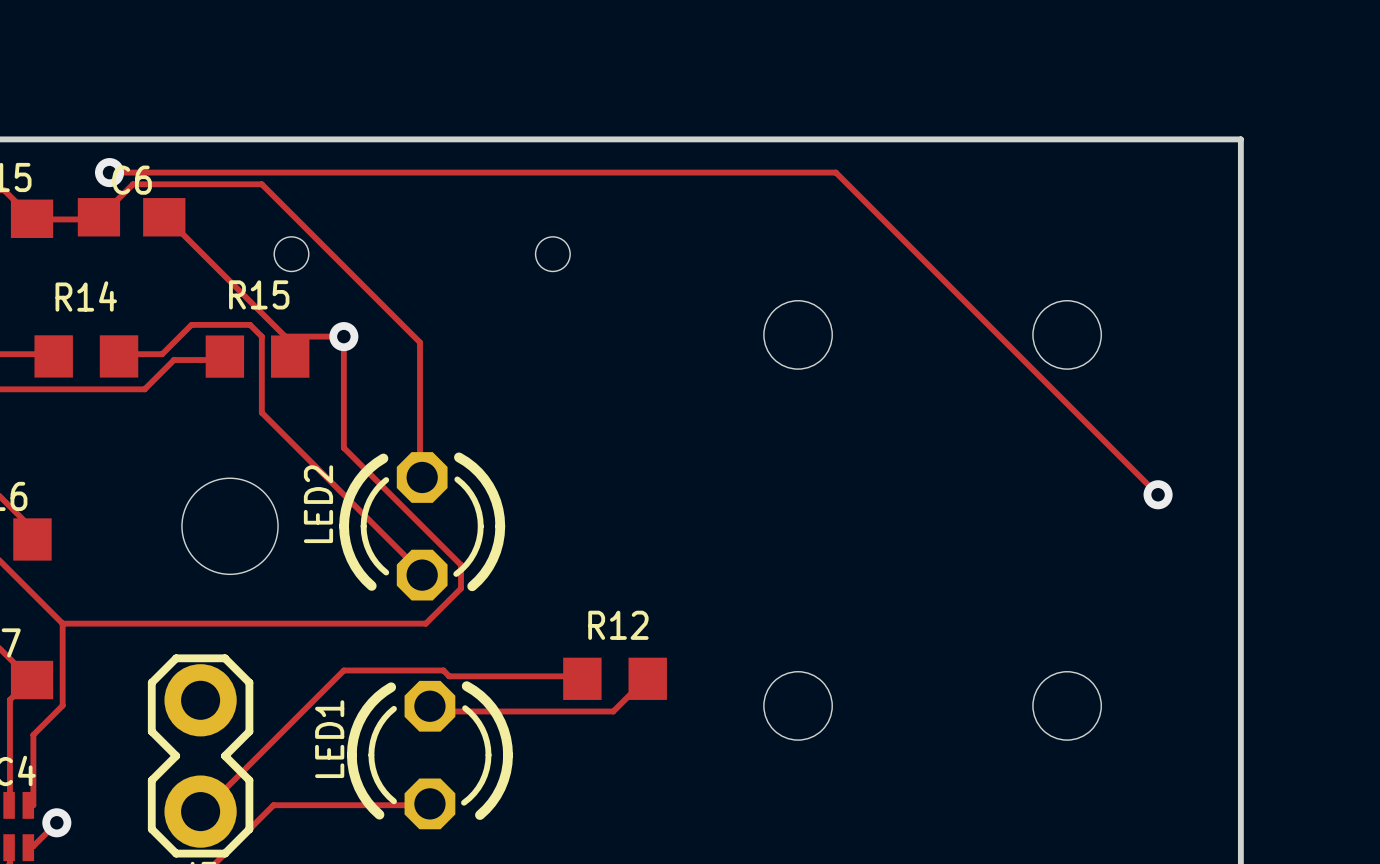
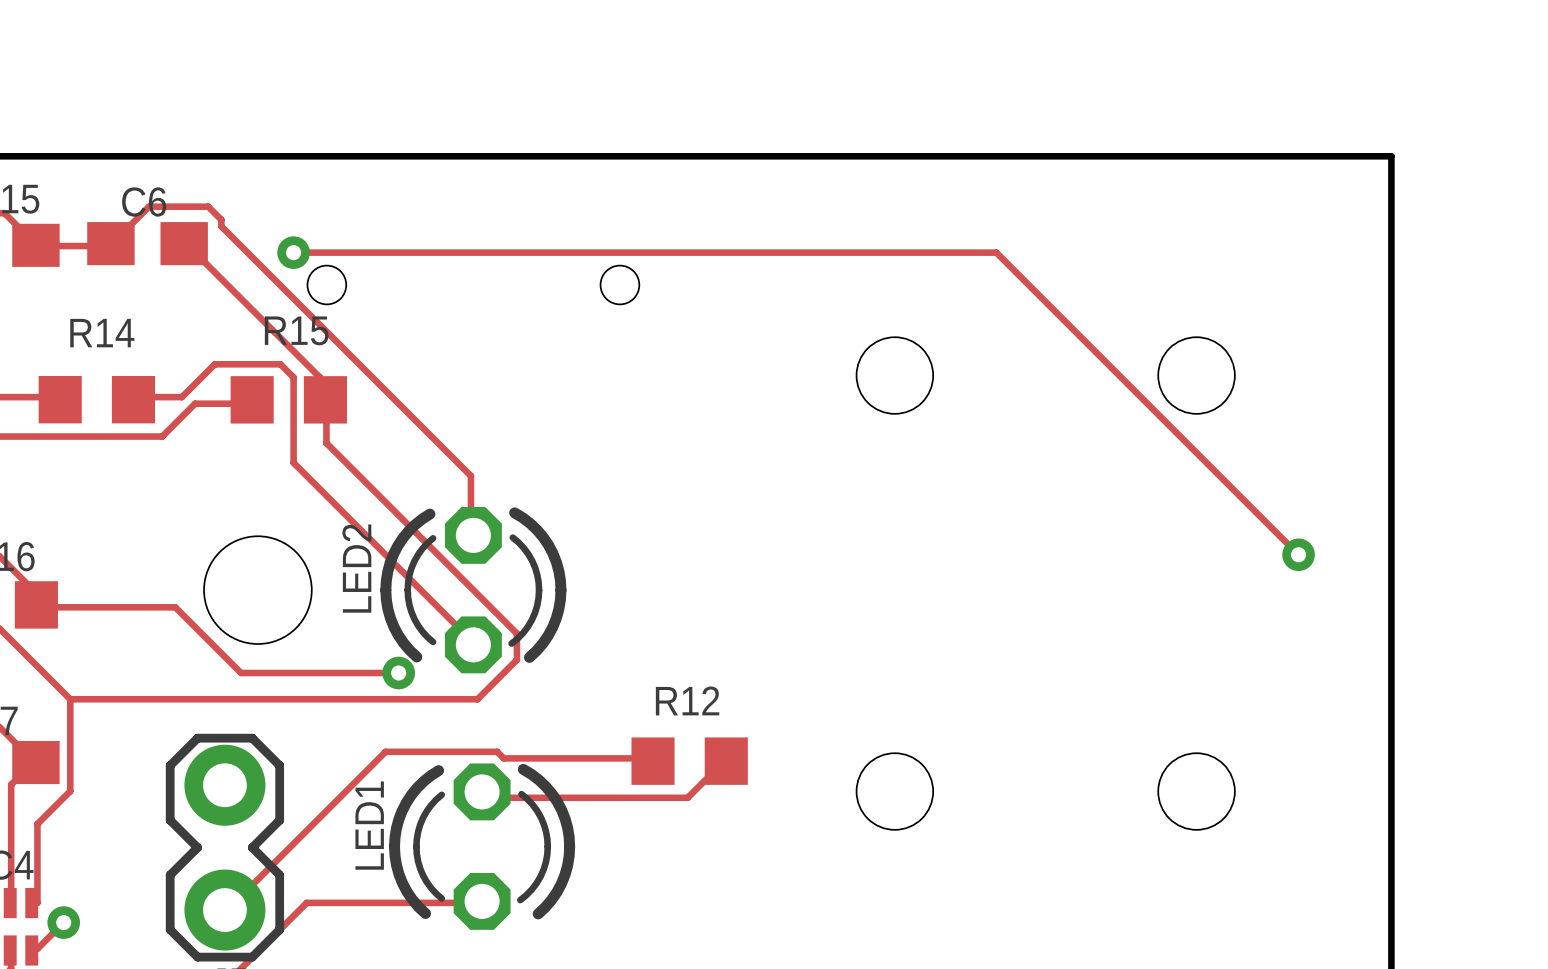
track: (109, 172) (835, 172) (888, 225) -> (293, 252) (996, 252)
via: (109, 172) -> none
track: (185, 184) (261, 184) (420, 342) (420, 424) -> (208, 206) (221, 219) (221, 226) (470, 475)
via: none -> (293, 252)
via: (343, 336) -> none
track: (290, 356) (285, 336) (343, 336) (343, 447) -> (325, 399) (326, 443) (385, 502)
track: none -> (36, 604) (37, 607) (175, 607) (241, 673) (398, 673)
via: none -> (398, 673)

